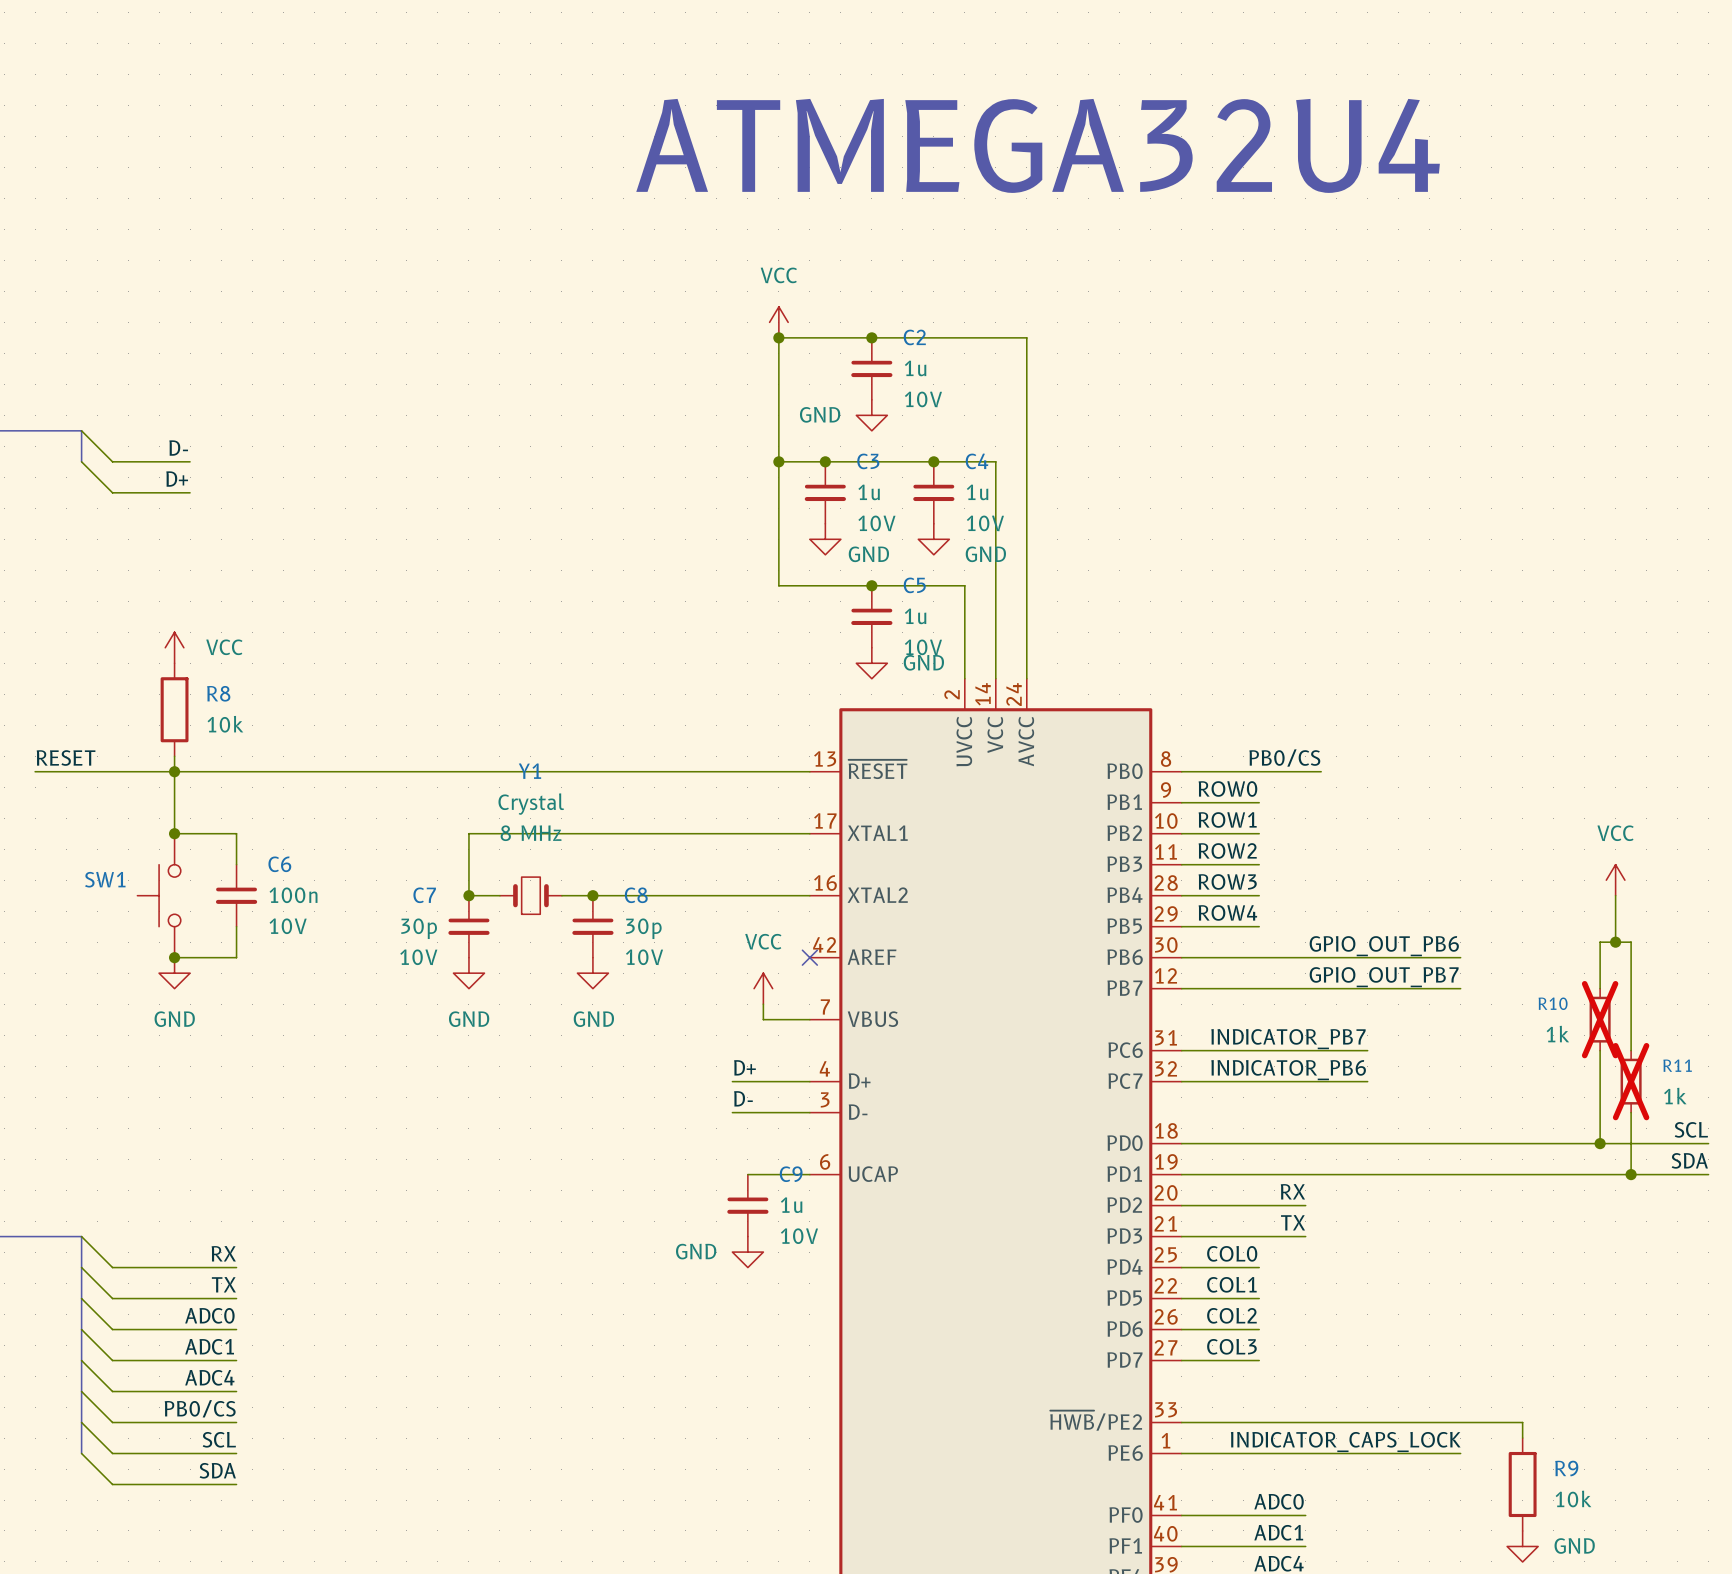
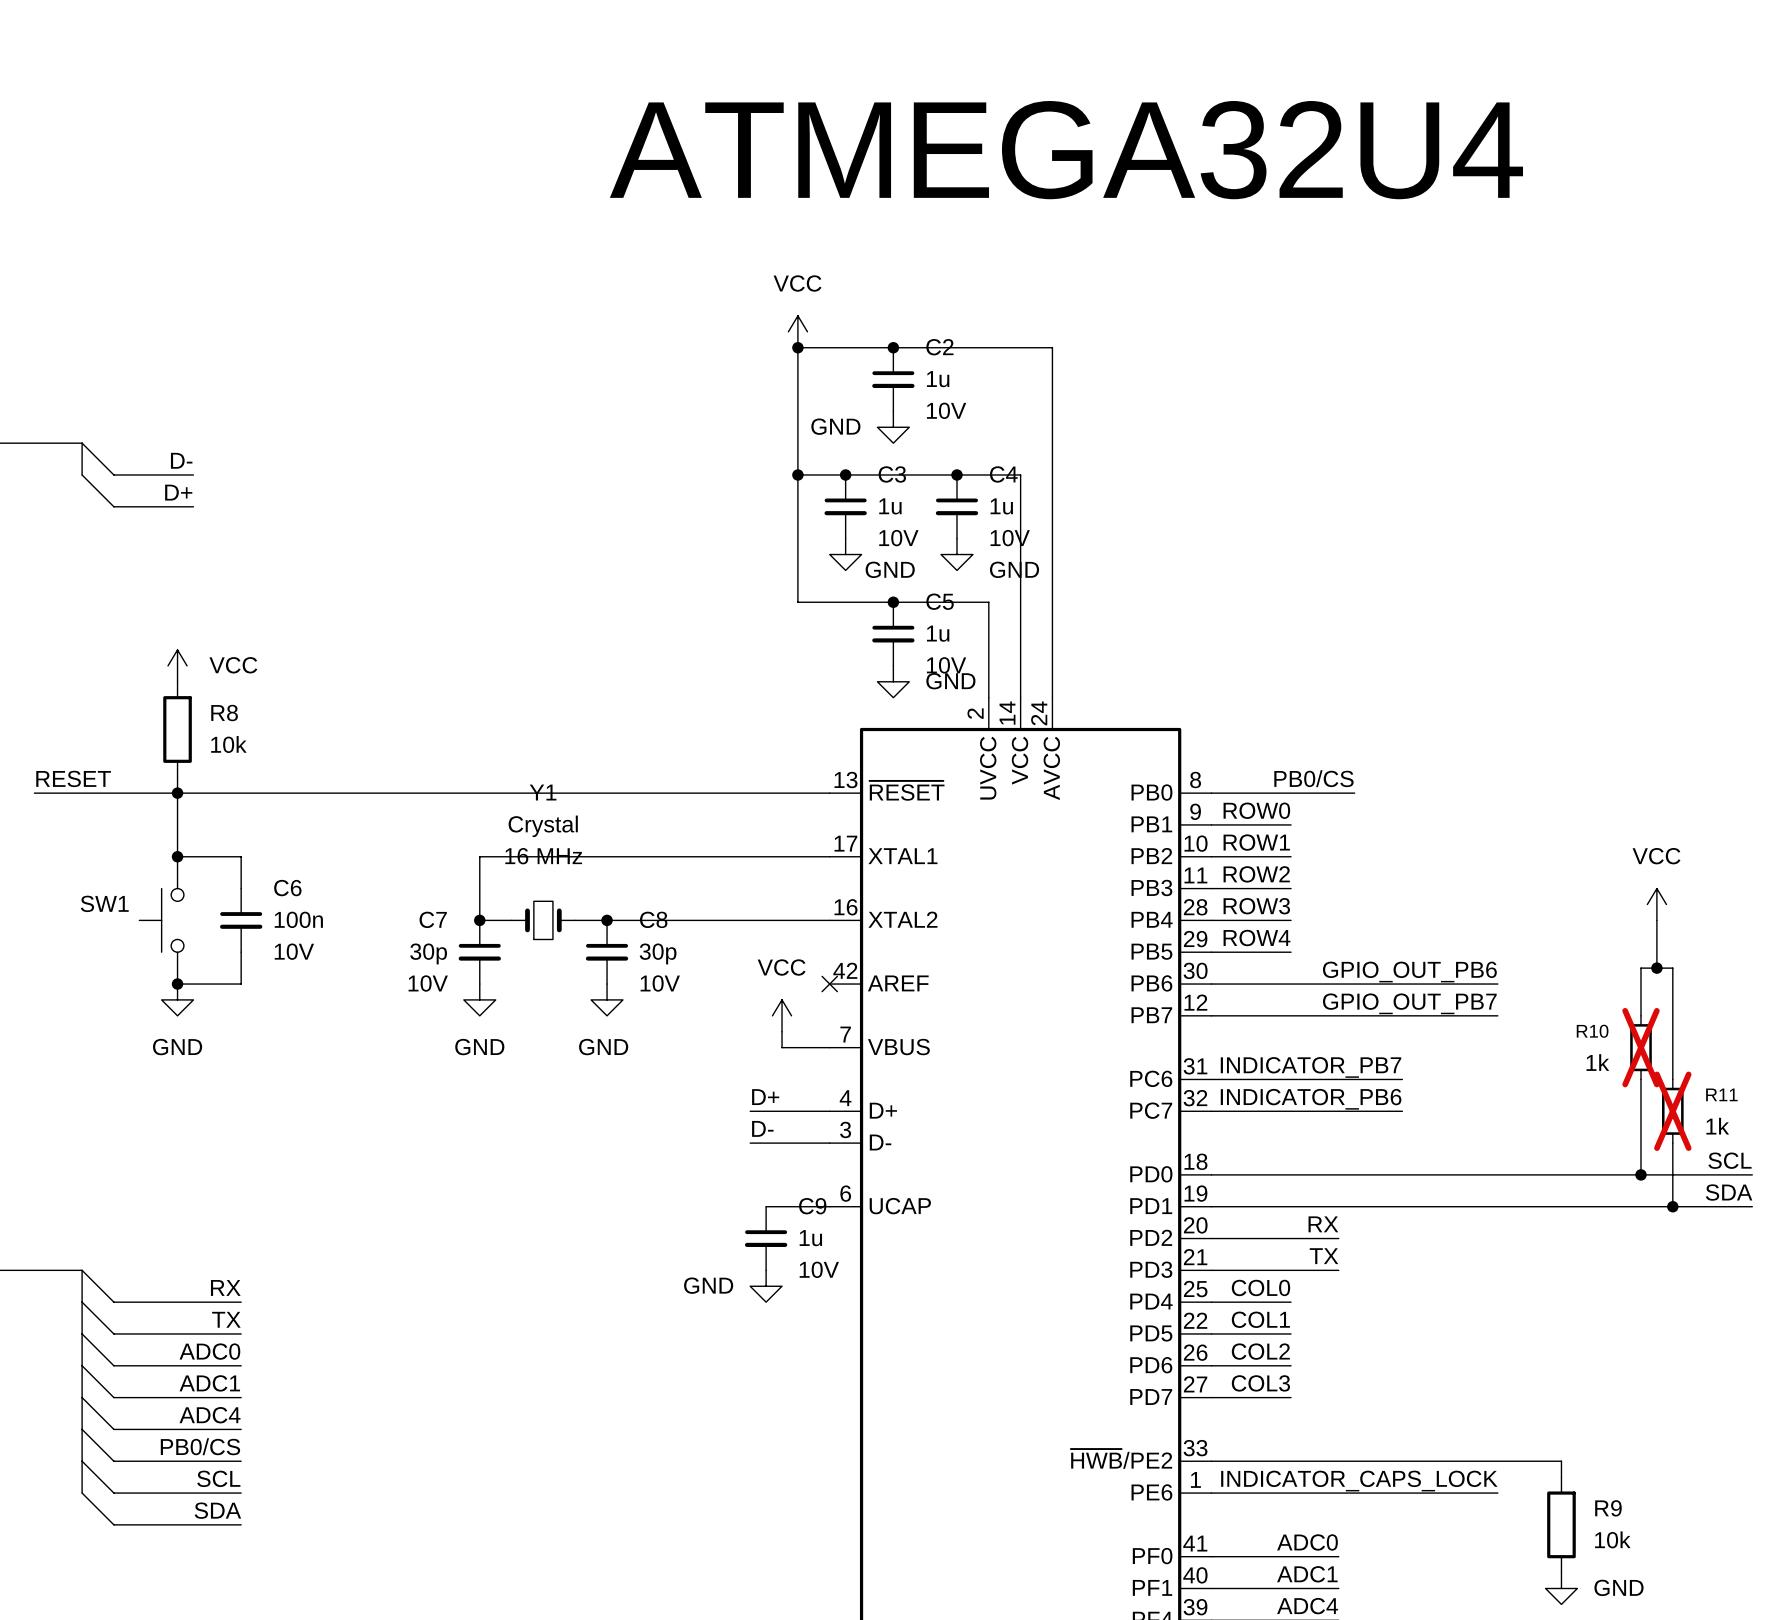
Y1 text: 8 MHz (531, 833) -> 16 MHz (543, 856)

